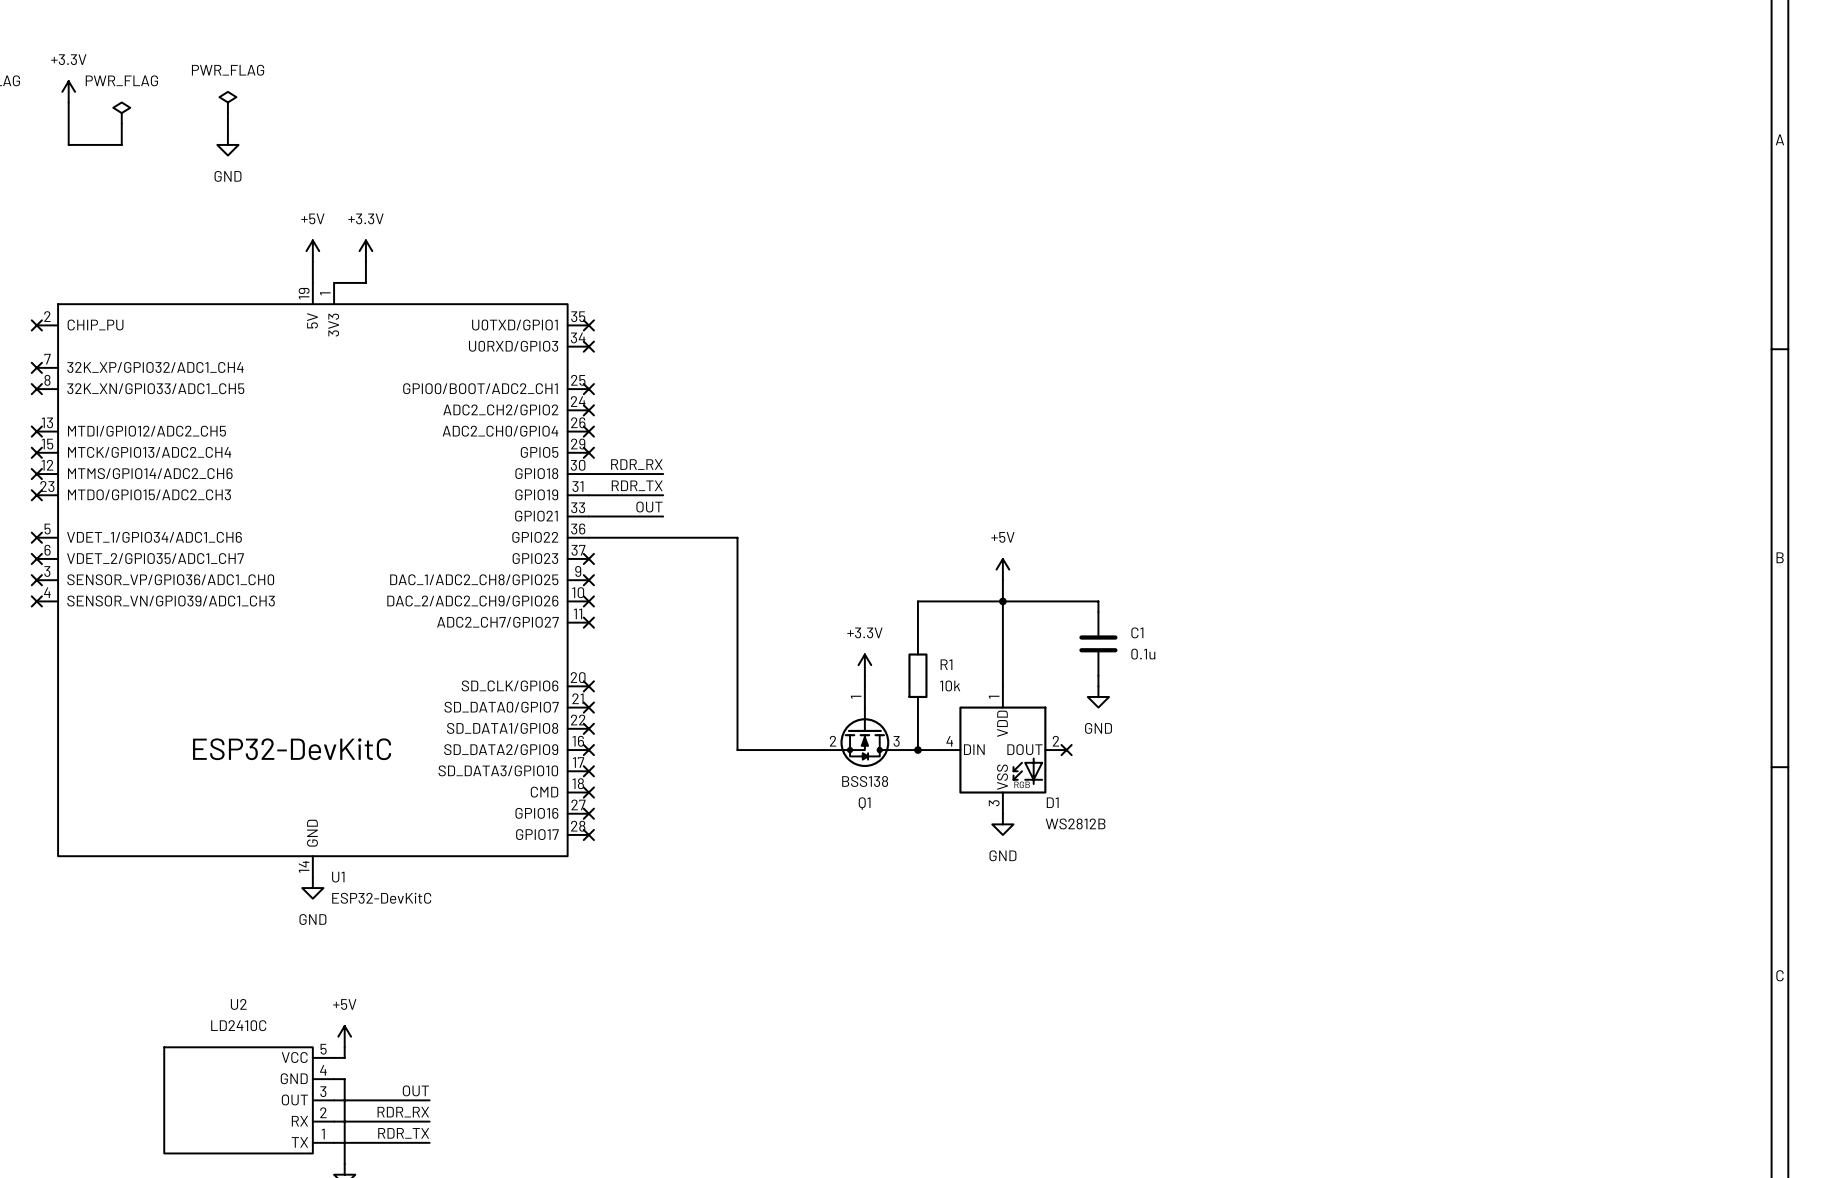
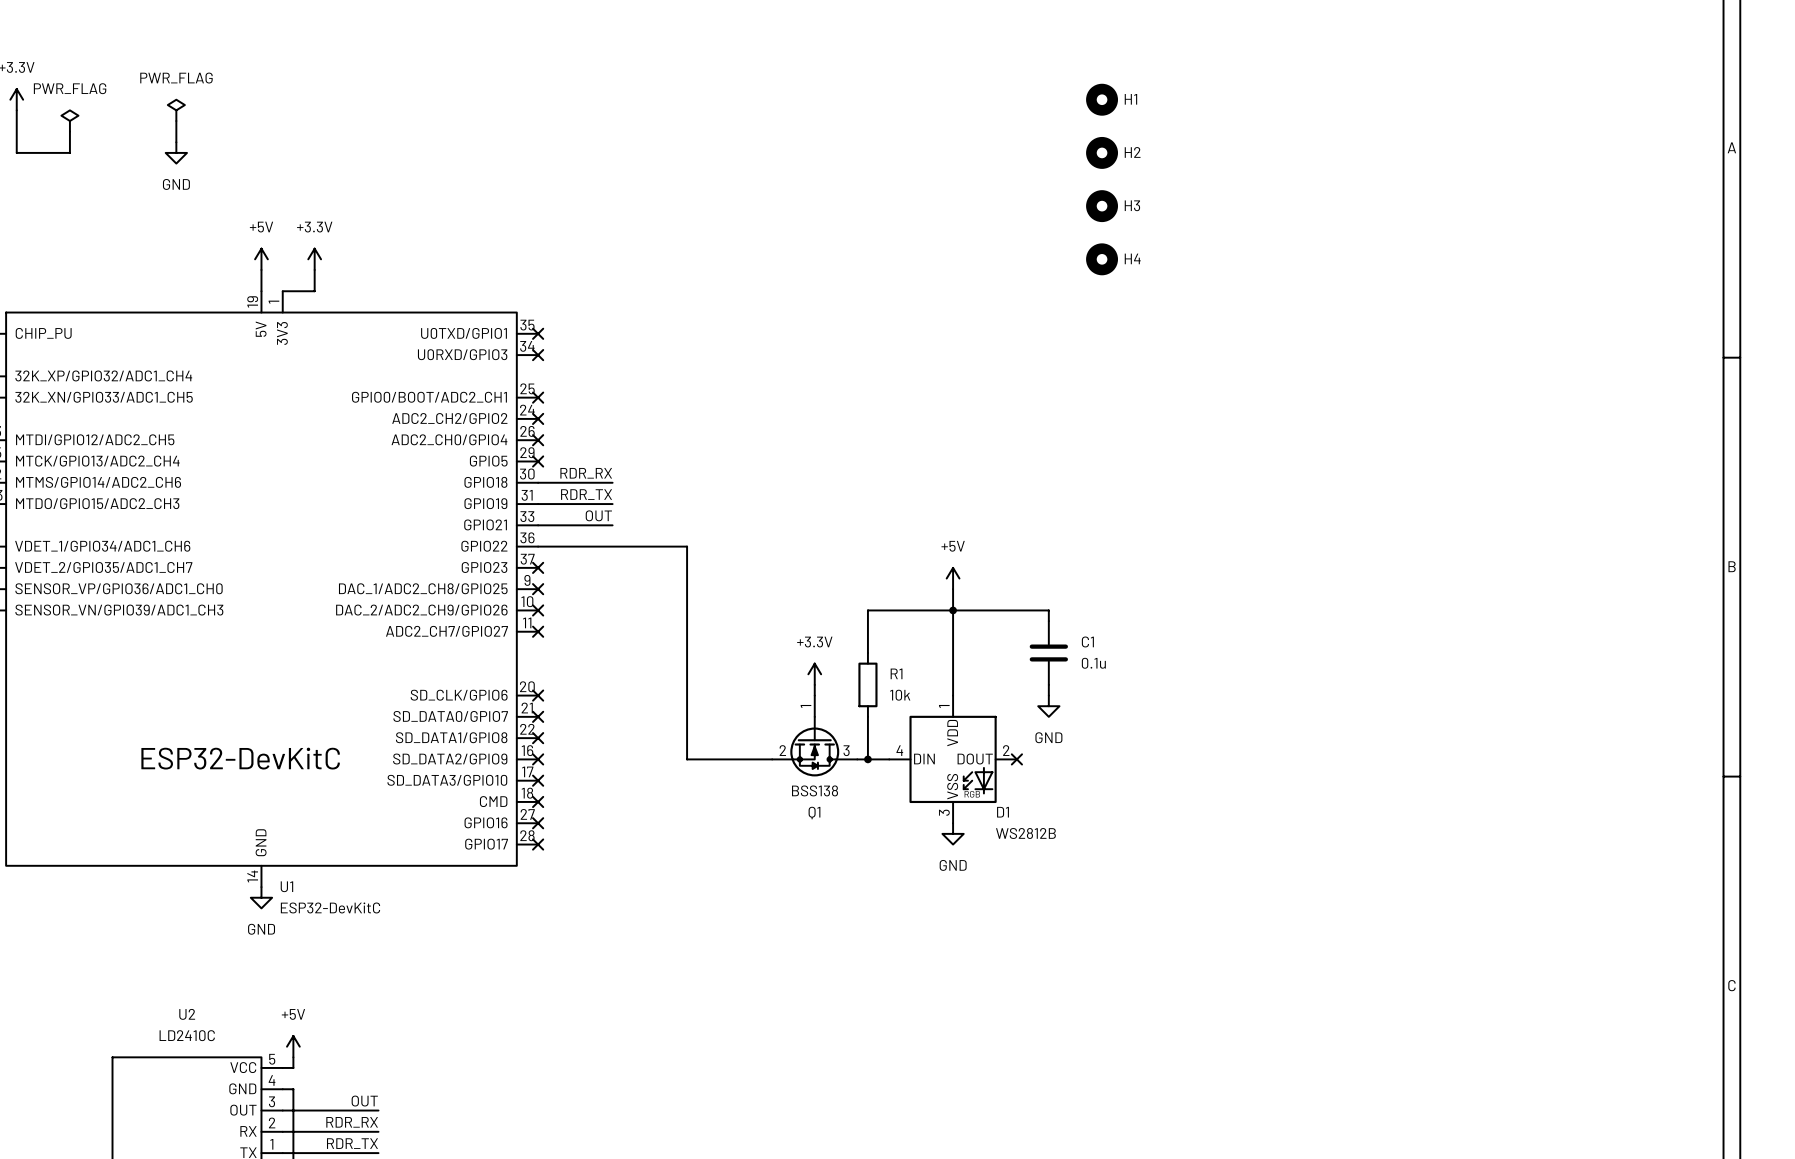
H1: none -> (1102, 99)
H2: none -> (1102, 152)
H3: none -> (1102, 206)
H4: none -> (1102, 259)

